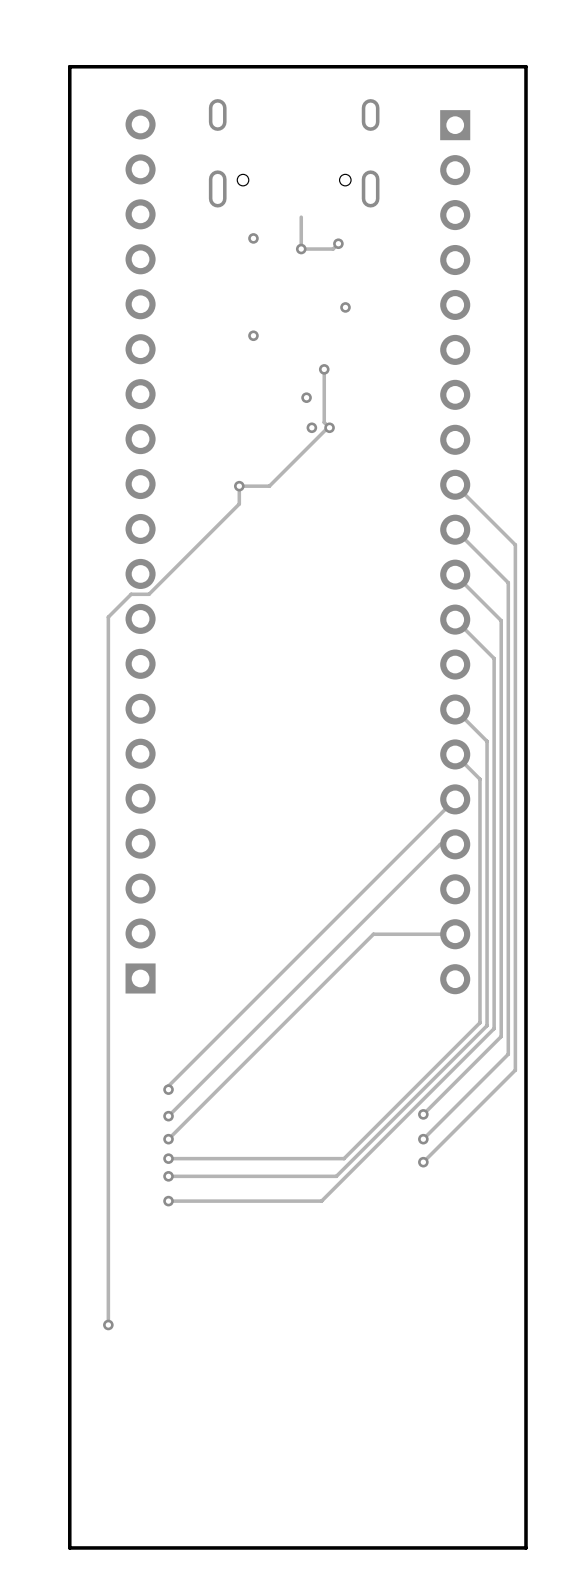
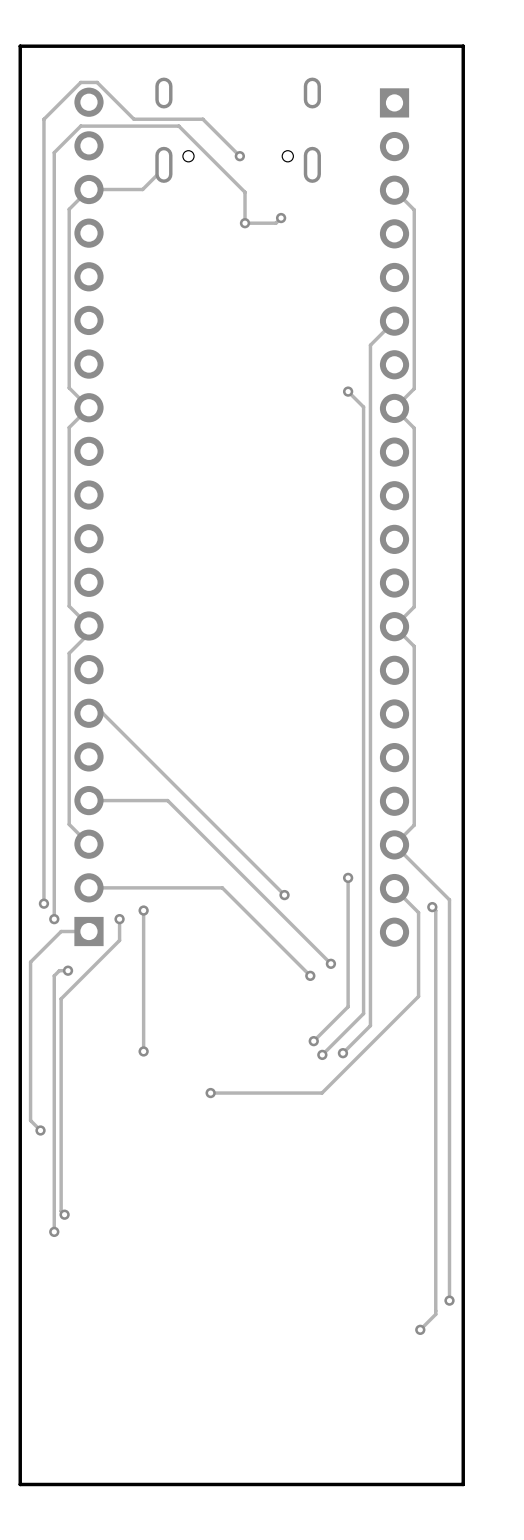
track: none -> (239, 156) (202, 119) (133, 119) (97, 82) (80, 82) (43, 119) (43, 903)
via: none -> (239, 156)
track: none -> (163, 168) (142, 189) (88, 189) (69, 209) (69, 387) (88, 407) (69, 427) (69, 606) (88, 625) (88, 633) (69, 653) (69, 824) (88, 844)
track: none -> (394, 190) (414, 209) (414, 388) (394, 408) (414, 428) (414, 606) (394, 626) (414, 646) (414, 825) (394, 844) (449, 899) (449, 1300)
track: none -> (245, 192) (178, 126) (80, 126) (54, 152) (54, 919)
via: (253, 238) -> none
via: (345, 307) -> none
via: (253, 335) -> none
track: none -> (394, 321) (370, 345) (370, 1025) (342, 1053)
track: (324, 369) (324, 422) (329, 427) (269, 486) (239, 486) (239, 503) (148, 594) (131, 594) (108, 617) (108, 1324) -> none
via: (324, 369) -> none
via: (306, 397) -> none
track: none -> (348, 391) (363, 407) (363, 1013) (322, 1054)
via: none -> (348, 391)
via: (311, 427) -> none
via: (329, 427) -> none
track: (455, 484) (515, 544) (515, 1070) (423, 1162) -> none
via: (239, 486) -> none
track: (455, 529) (508, 582) (508, 1054) (423, 1139) -> none
track: (455, 574) (501, 620) (501, 1036) (423, 1114) -> none
track: (455, 619) (494, 658) (494, 1028) (321, 1201) (168, 1201) -> none
track: (455, 709) (487, 741) (487, 1025) (336, 1176) (168, 1176) -> none
track: none -> (88, 713) (102, 713) (284, 895)
track: (455, 754) (479, 779) (479, 959) -> (394, 888) (418, 912)
track: (455, 799) (168, 1086) (168, 1089) -> none
track: none -> (88, 800) (167, 800) (330, 963)
track: (455, 844) (440, 844) (168, 1116) -> none
track: none -> (348, 877) (348, 1006) (313, 1041)
via: none -> (348, 877)
track: none -> (88, 887) (222, 887) (310, 975)
track: (455, 934) (373, 934) (168, 1139) -> none
via: none -> (284, 895)
via: none -> (43, 903)
track: none -> (432, 907) (435, 910) (435, 1314) (420, 1329)
via: none -> (432, 907)
track: none -> (143, 910) (143, 1051)
via: none -> (143, 910)
via: none -> (54, 919)
track: none -> (119, 919) (119, 940) (61, 998) (61, 1211) (64, 1214)
via: none -> (119, 919)
track: none -> (88, 931) (61, 931) (30, 962) (30, 1120) (40, 1130)
via: none -> (330, 963)
track: none -> (68, 970) (59, 970) (54, 975) (54, 1231)
via: none -> (68, 970)
track: (479, 1022) (344, 1158) (168, 1158) -> (418, 974) (418, 996) (321, 1093) (210, 1093)
via: none -> (310, 975)
via: (168, 1089) -> none
via: none -> (313, 1041)
via: none -> (143, 1051)
via: none -> (342, 1053)
via: none -> (322, 1054)
via: (423, 1114) -> none
via: (168, 1116) -> none
via: (168, 1139) -> none
via: (423, 1139) -> none
via: none -> (210, 1093)
via: (168, 1158) -> none
via: (423, 1162) -> none
via: (168, 1176) -> none
via: none -> (40, 1130)
via: (168, 1201) -> none
via: none -> (64, 1214)
via: none -> (54, 1231)
via: (108, 1324) -> none
via: none -> (449, 1300)
via: none -> (420, 1329)

